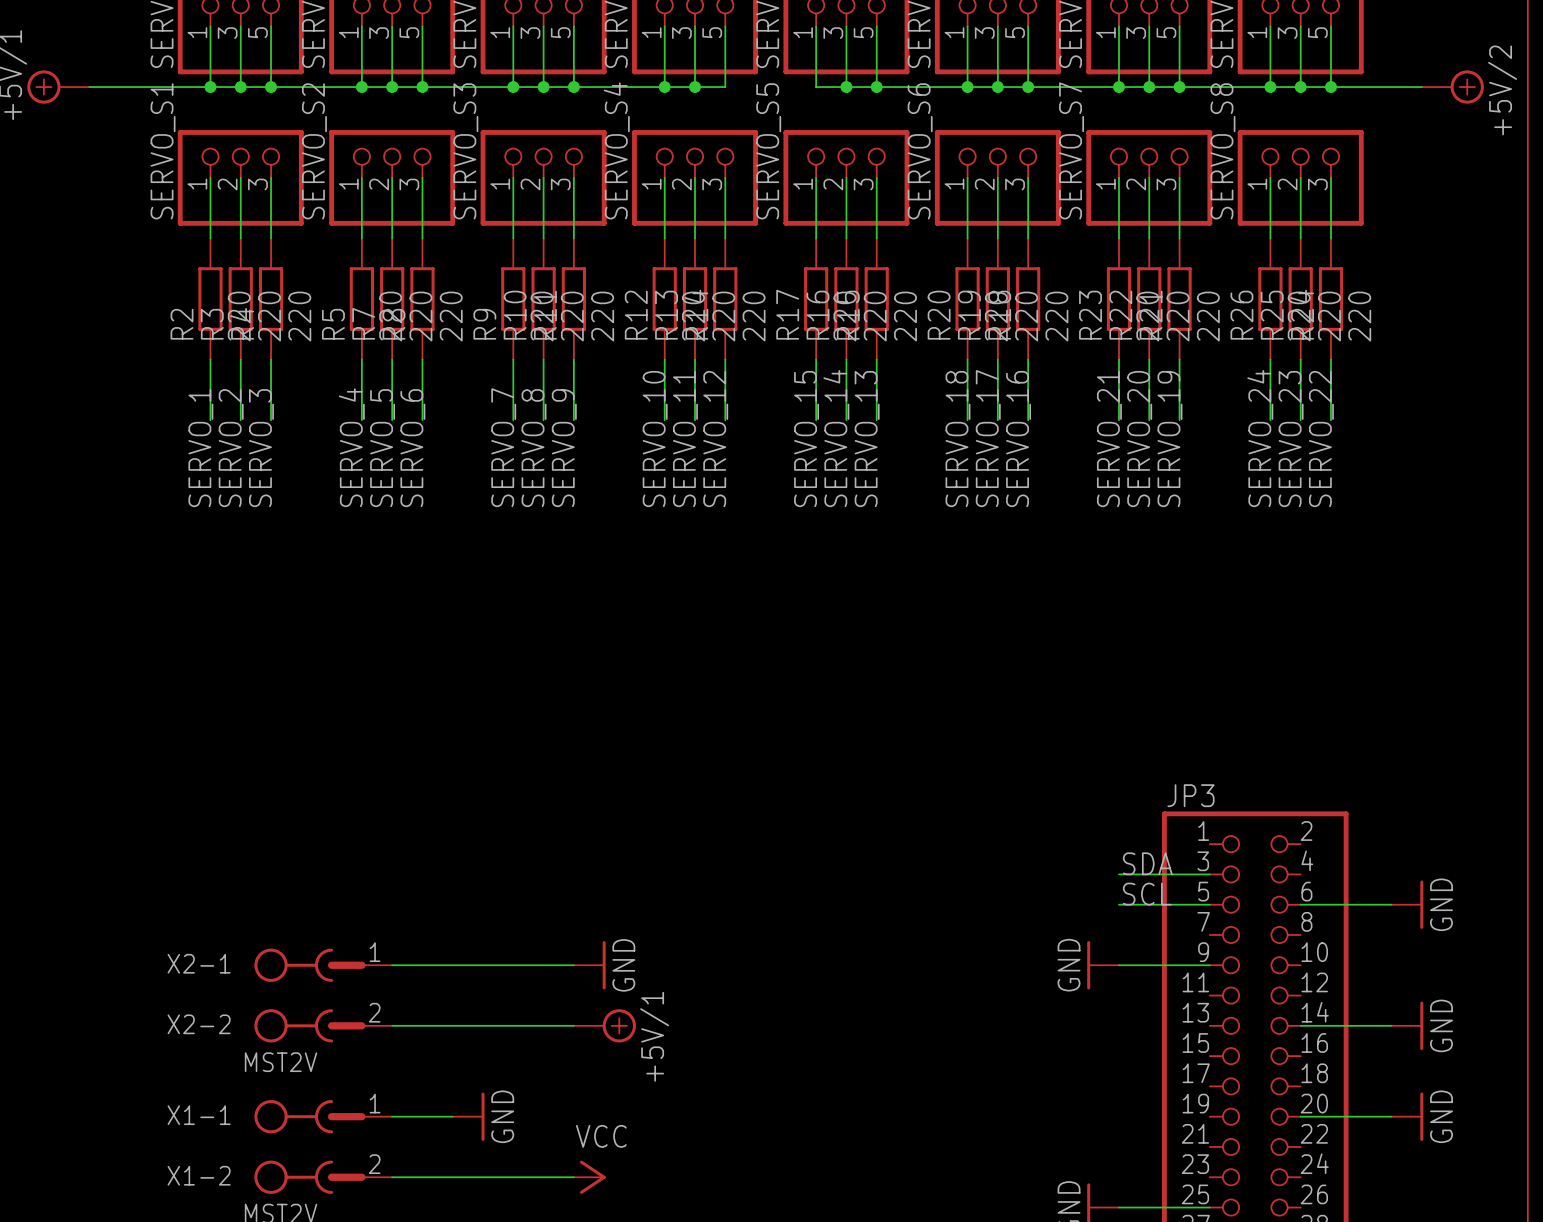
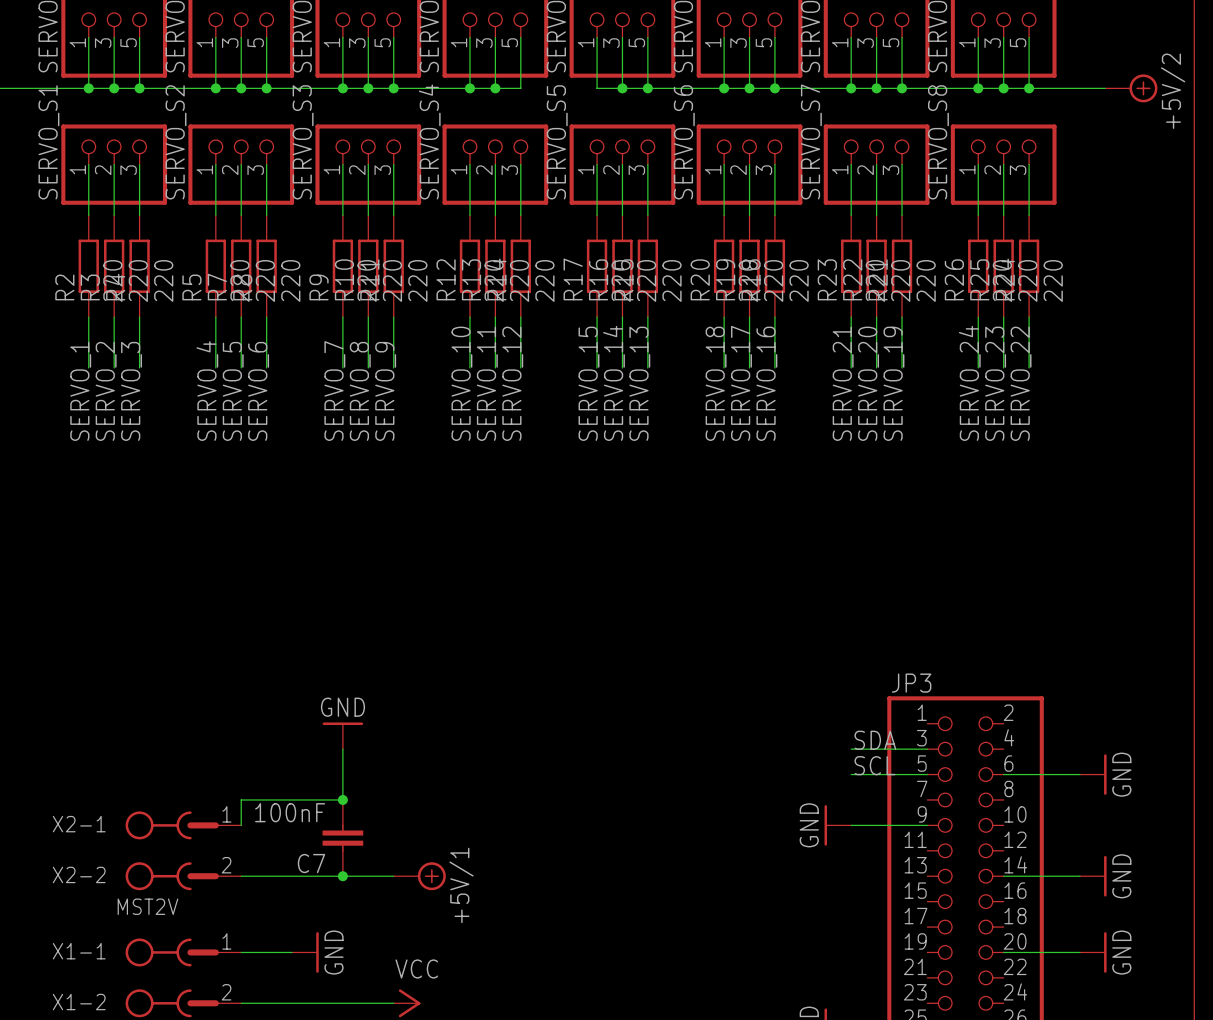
junction: none -> (342, 799)
wire: (392, 965) (573, 965) -> (241, 825) (241, 799) (342, 799) (342, 749)
power symbol position: GND (589, 965) -> GND (342, 735)
power symbol rotation: 0° (604, 965) -> 90° counterclockwise (342, 723)
C7: none -> 100nF (342, 838)
junction: none -> (342, 876)

